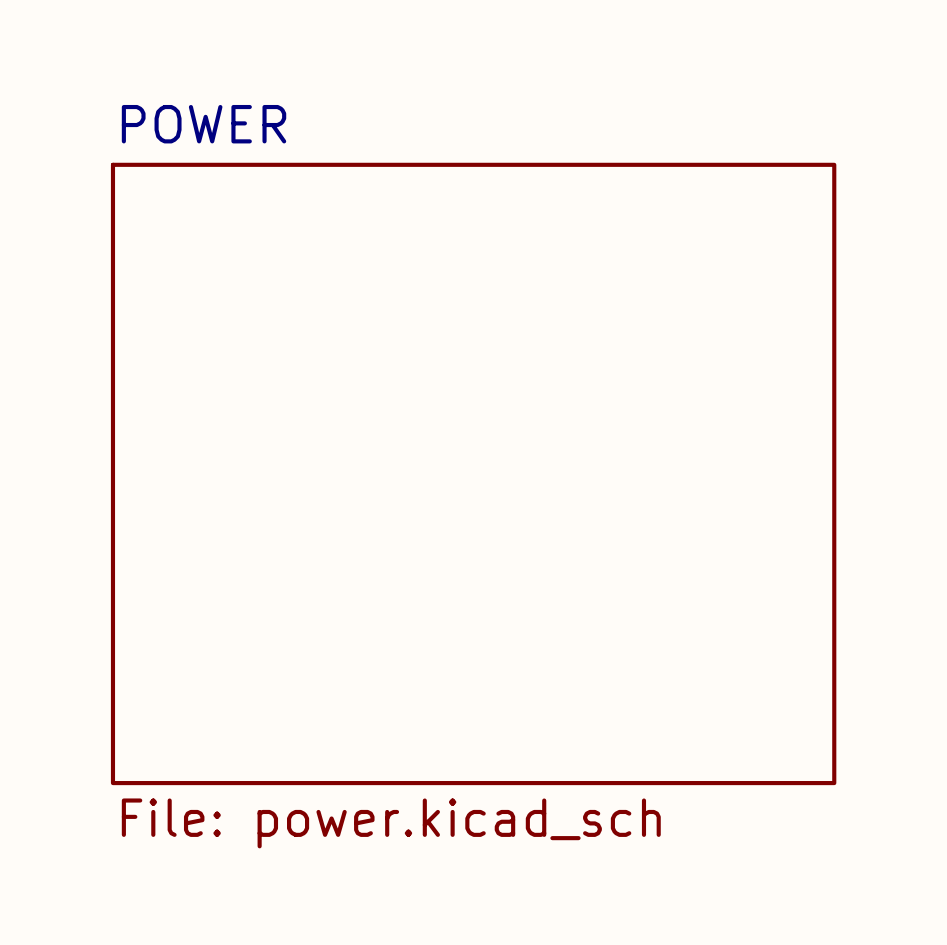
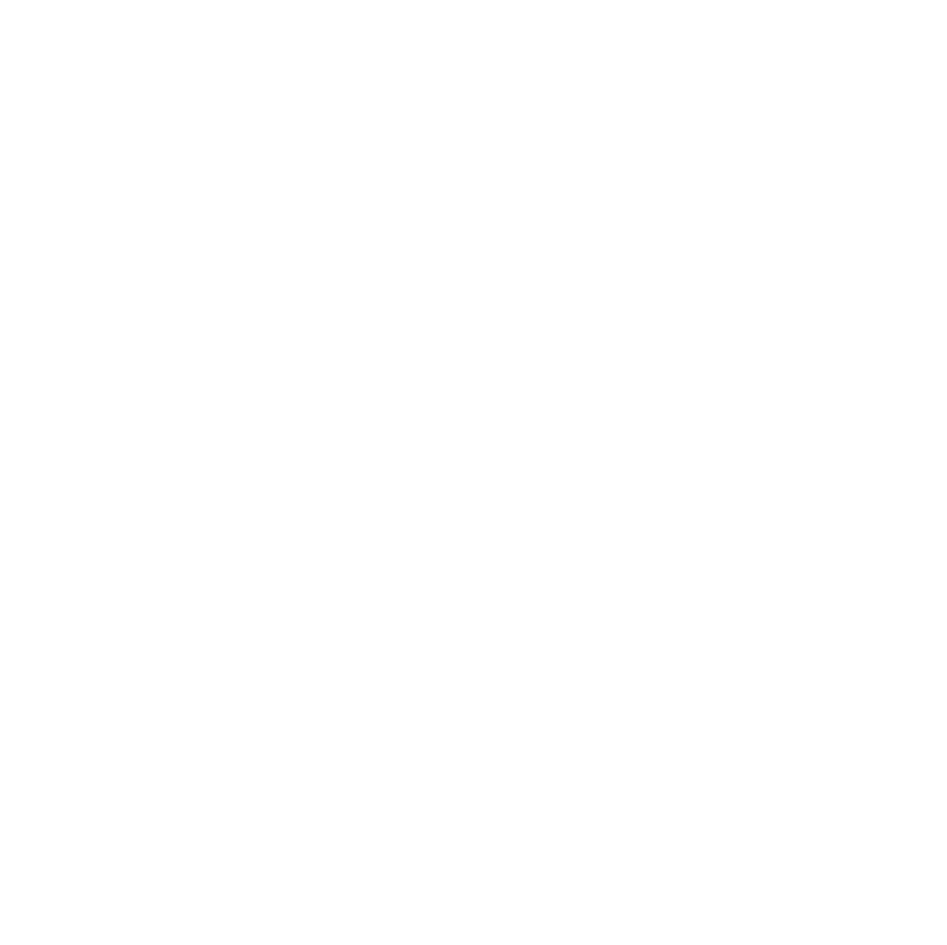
sheet POWER: File: power.kicad_sch (473, 473) -> none

